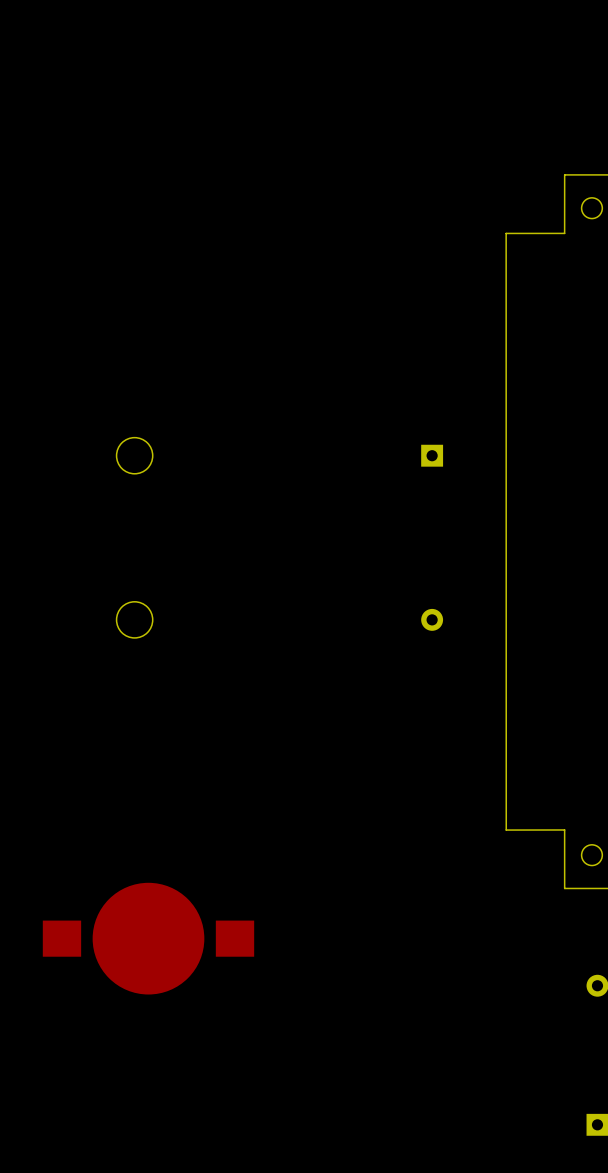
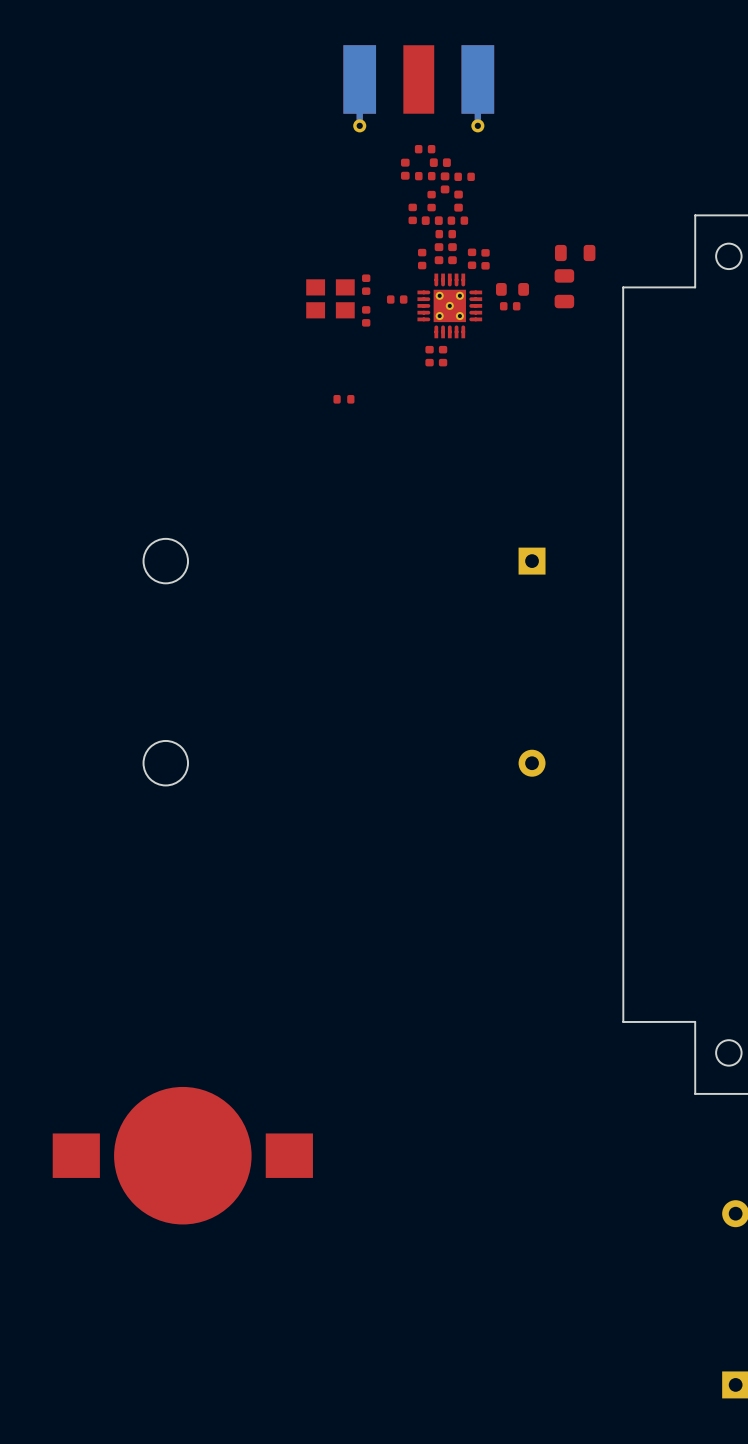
part: none -> (418, 88)
part: none -> (425, 149)
part: none -> (440, 162)
part: none -> (405, 169)
part: none -> (425, 176)
part: none -> (464, 176)
part: none -> (445, 182)
part: none -> (431, 201)
part: none -> (458, 201)
part: none -> (412, 213)
part: none -> (432, 220)
part: none -> (457, 220)
part: none -> (445, 234)
part: none -> (575, 253)
part: none -> (439, 253)
part: none -> (452, 253)
part: none -> (422, 259)
part: none -> (472, 258)
part: none -> (485, 259)
part: none -> (366, 284)
part: none -> (564, 288)
part: none -> (512, 289)
part: none -> (330, 298)
part: none -> (397, 299)
part: none -> (449, 305)
part: none -> (510, 306)
part: none -> (366, 316)
part: none -> (429, 356)
part: none -> (443, 356)
part: none -> (343, 399)

